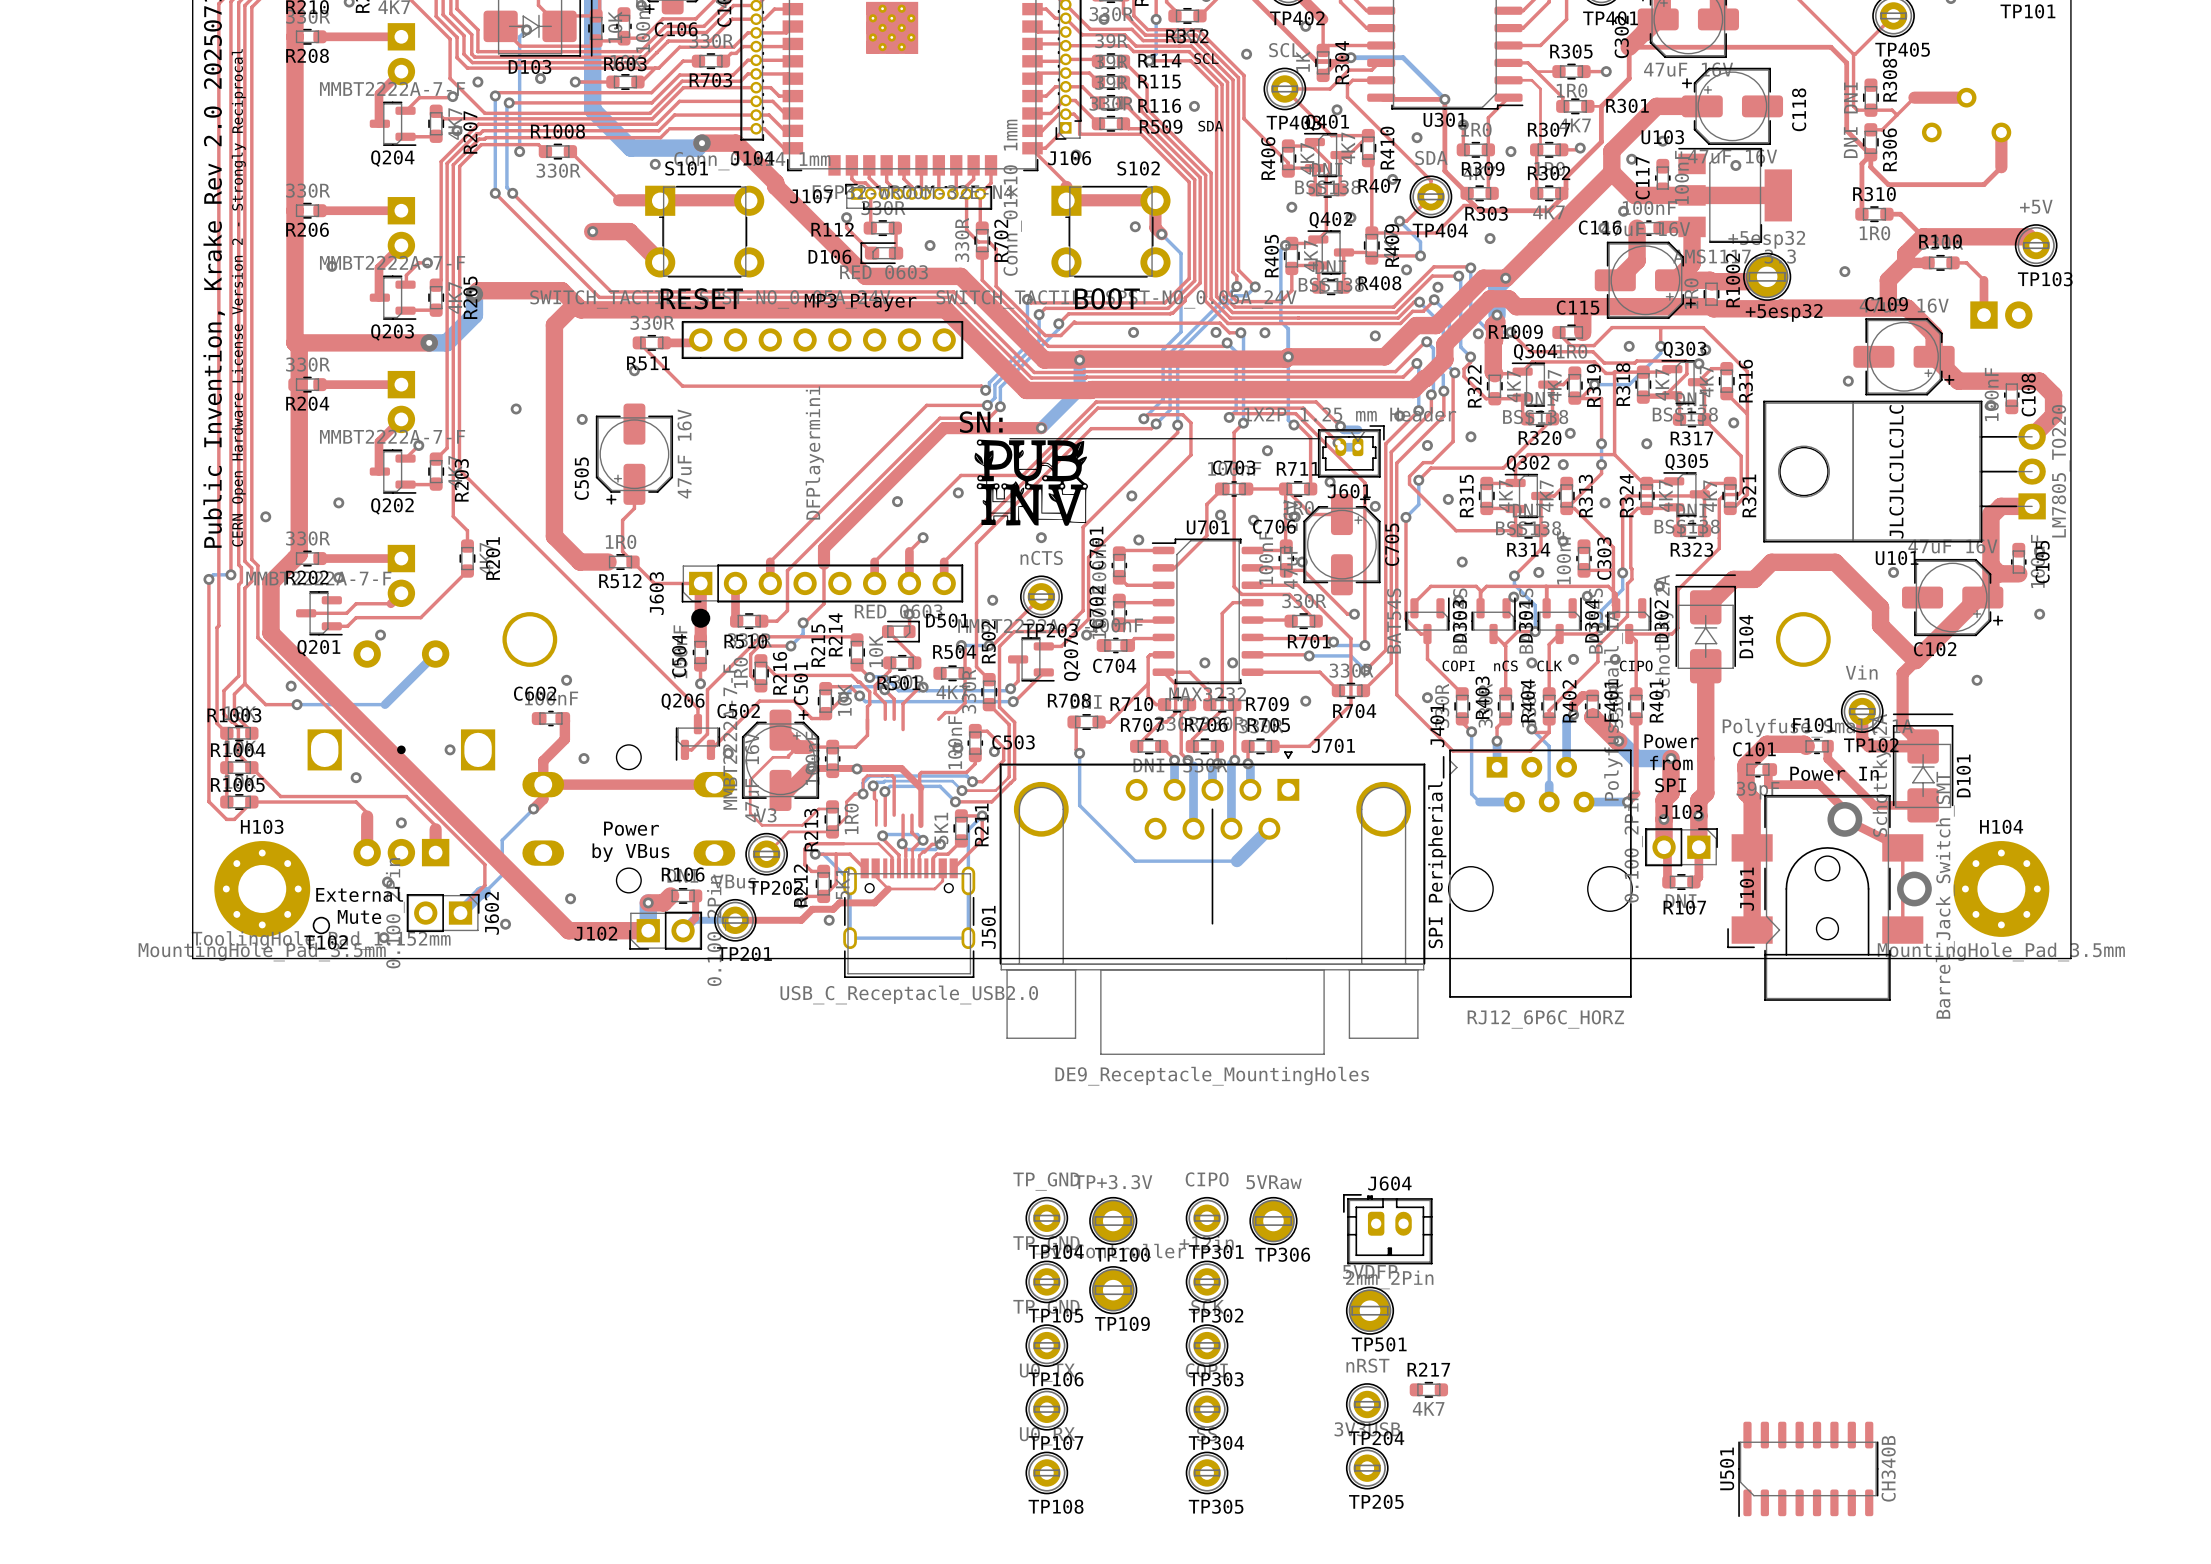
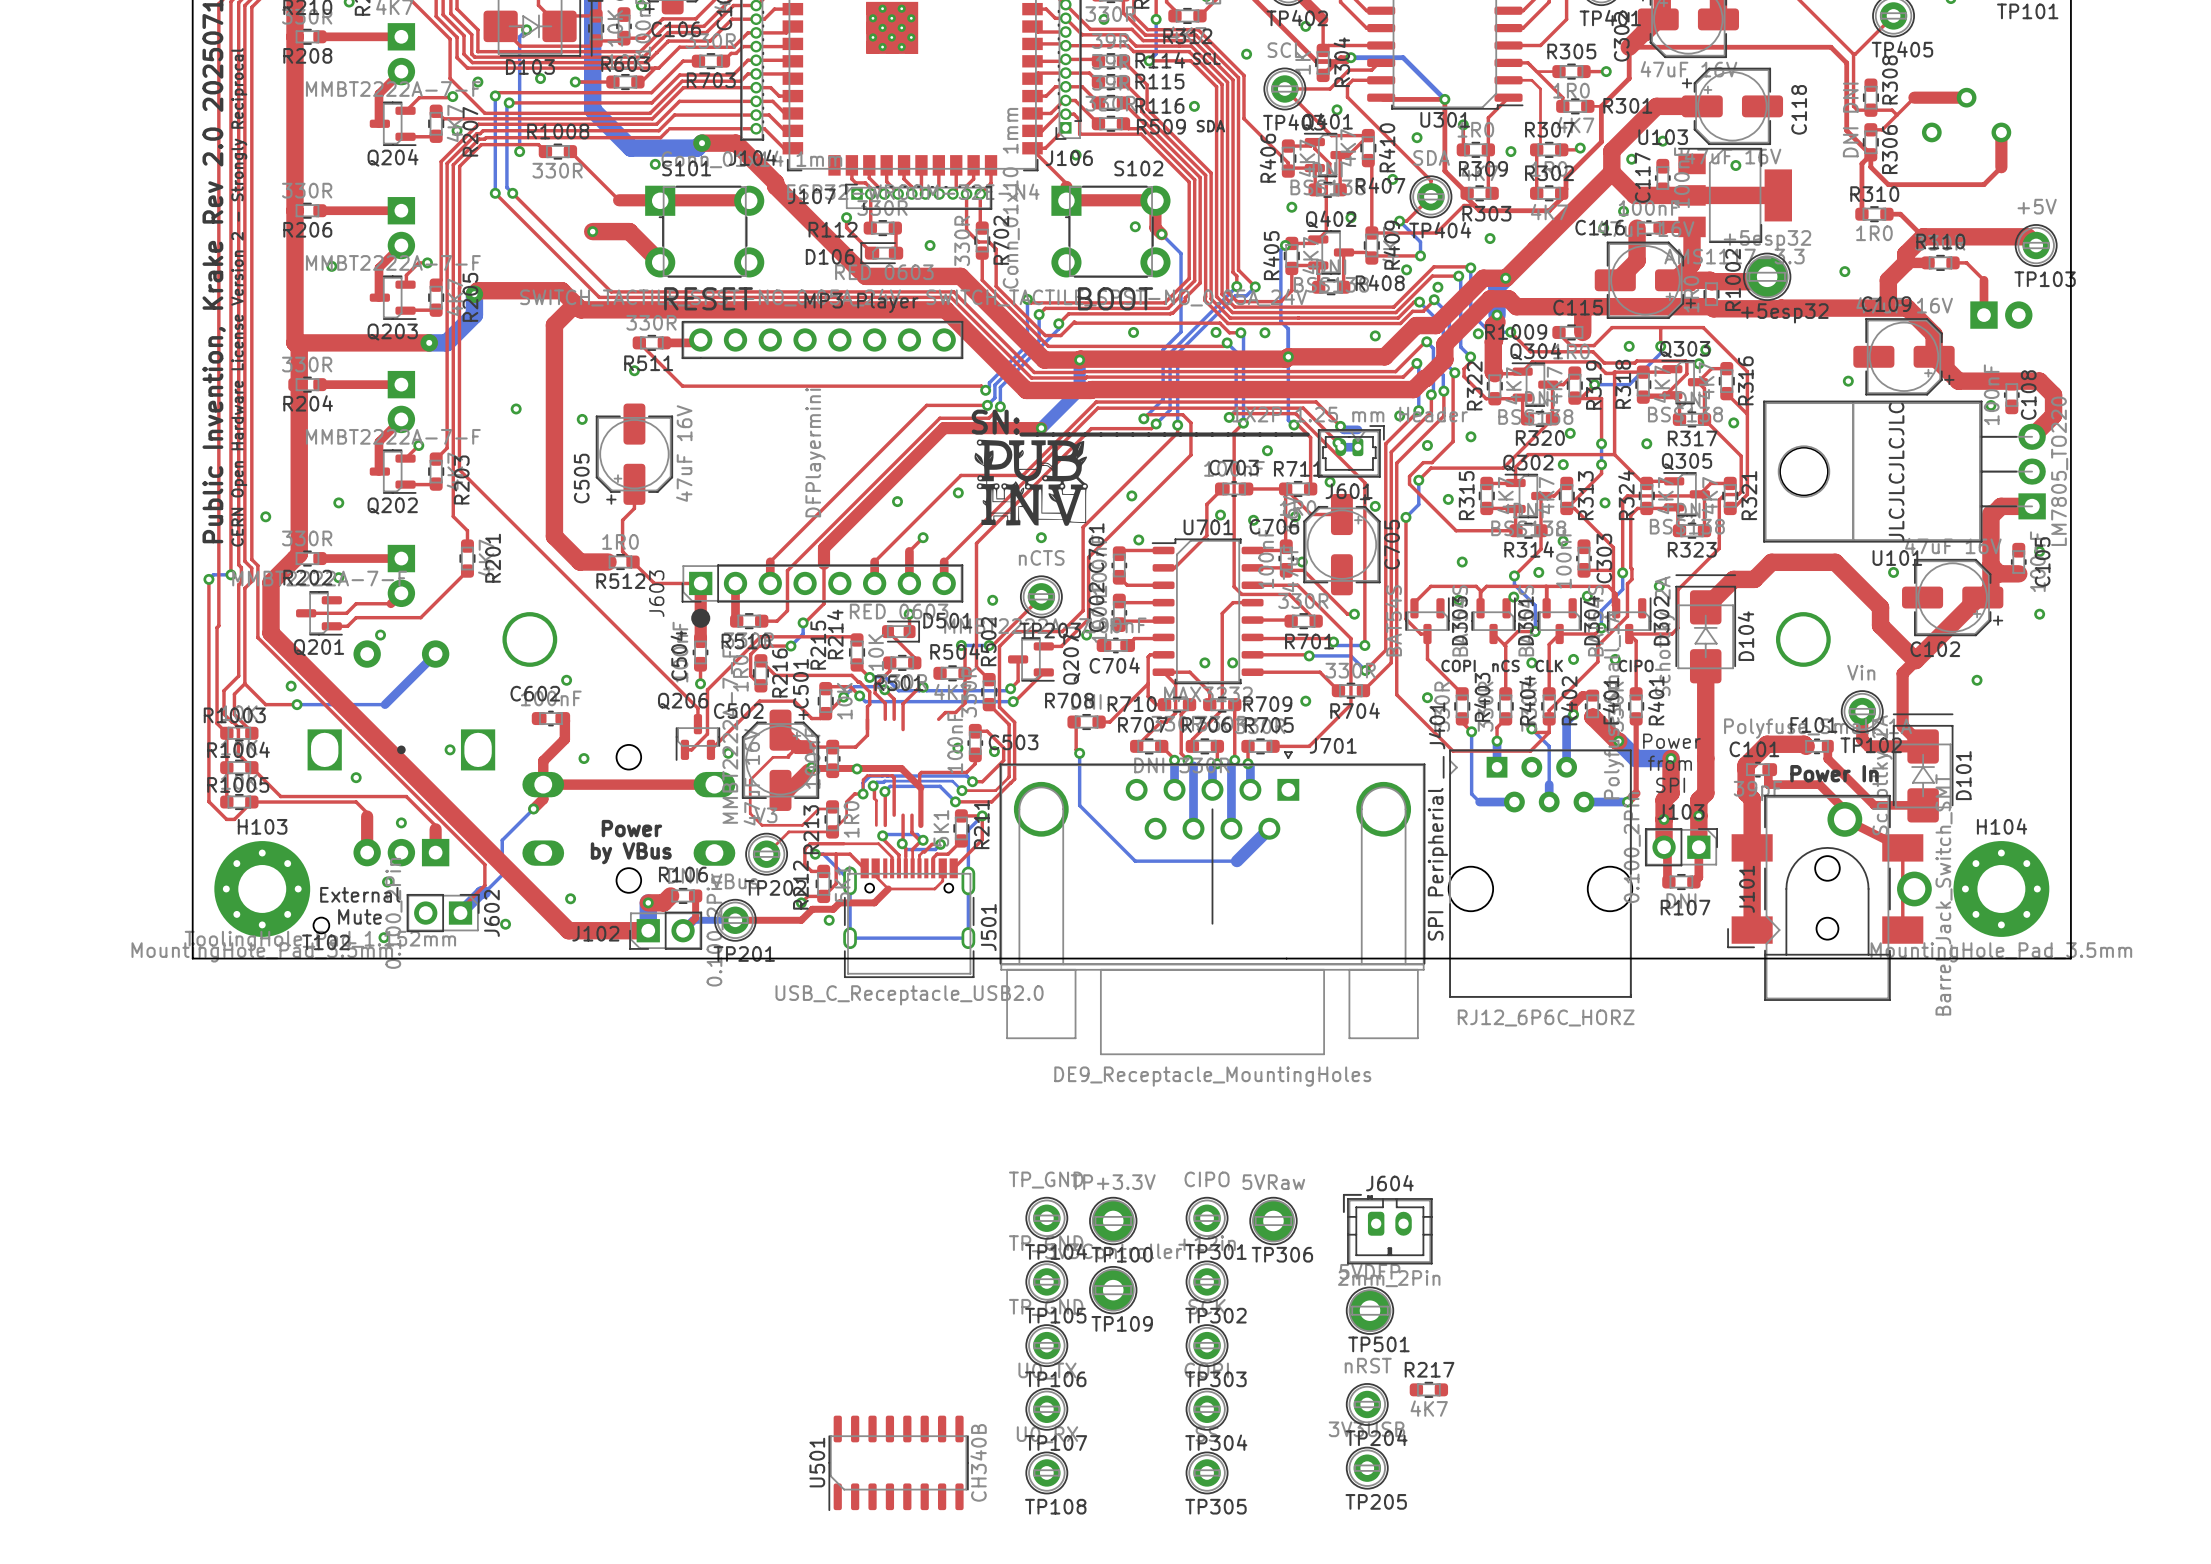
U501 position: (1808, 1469) -> (898, 1463)

